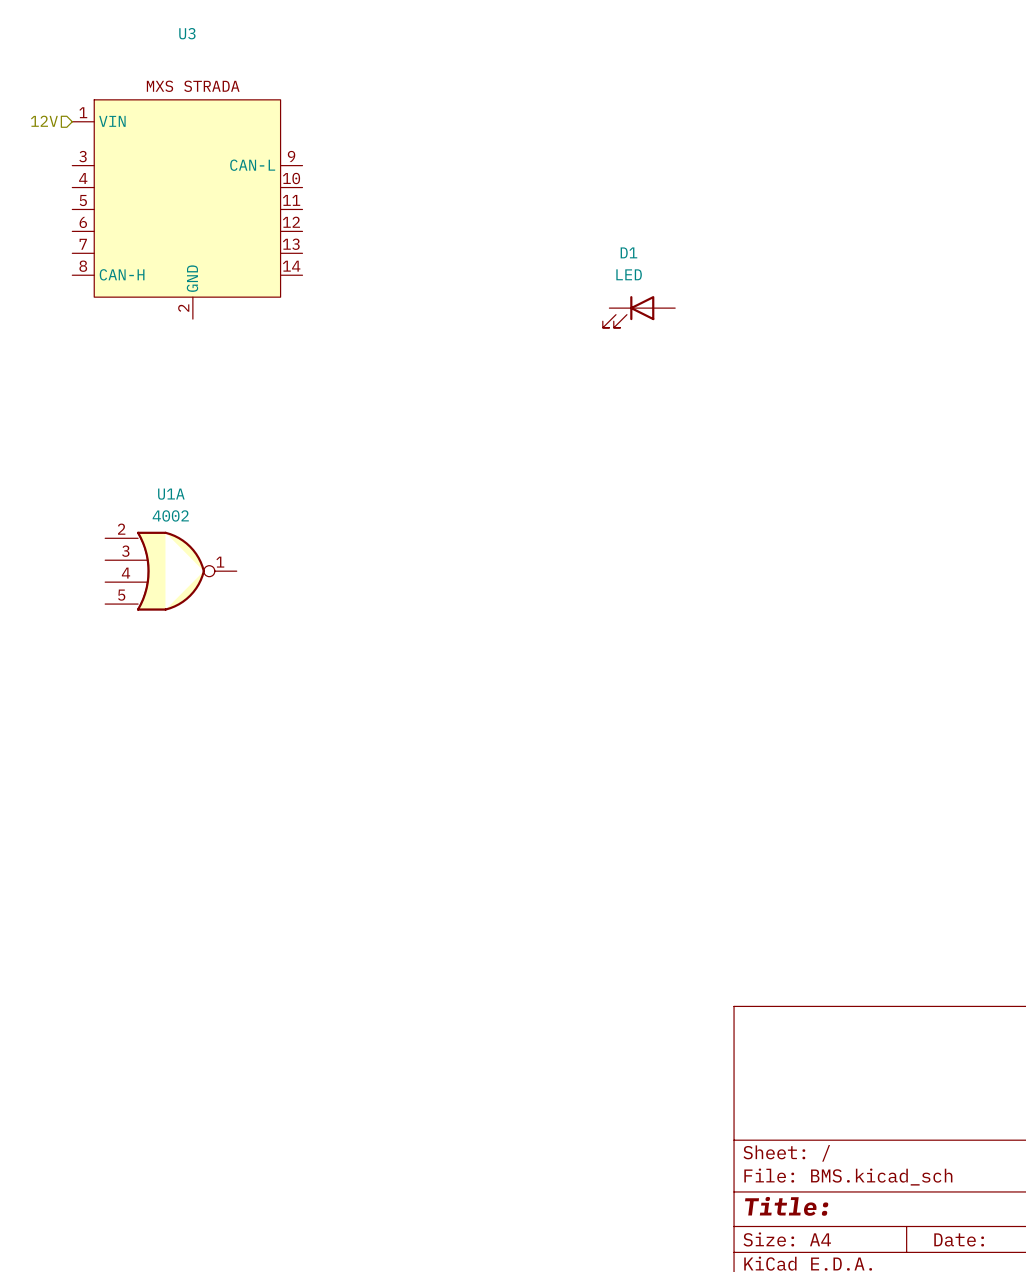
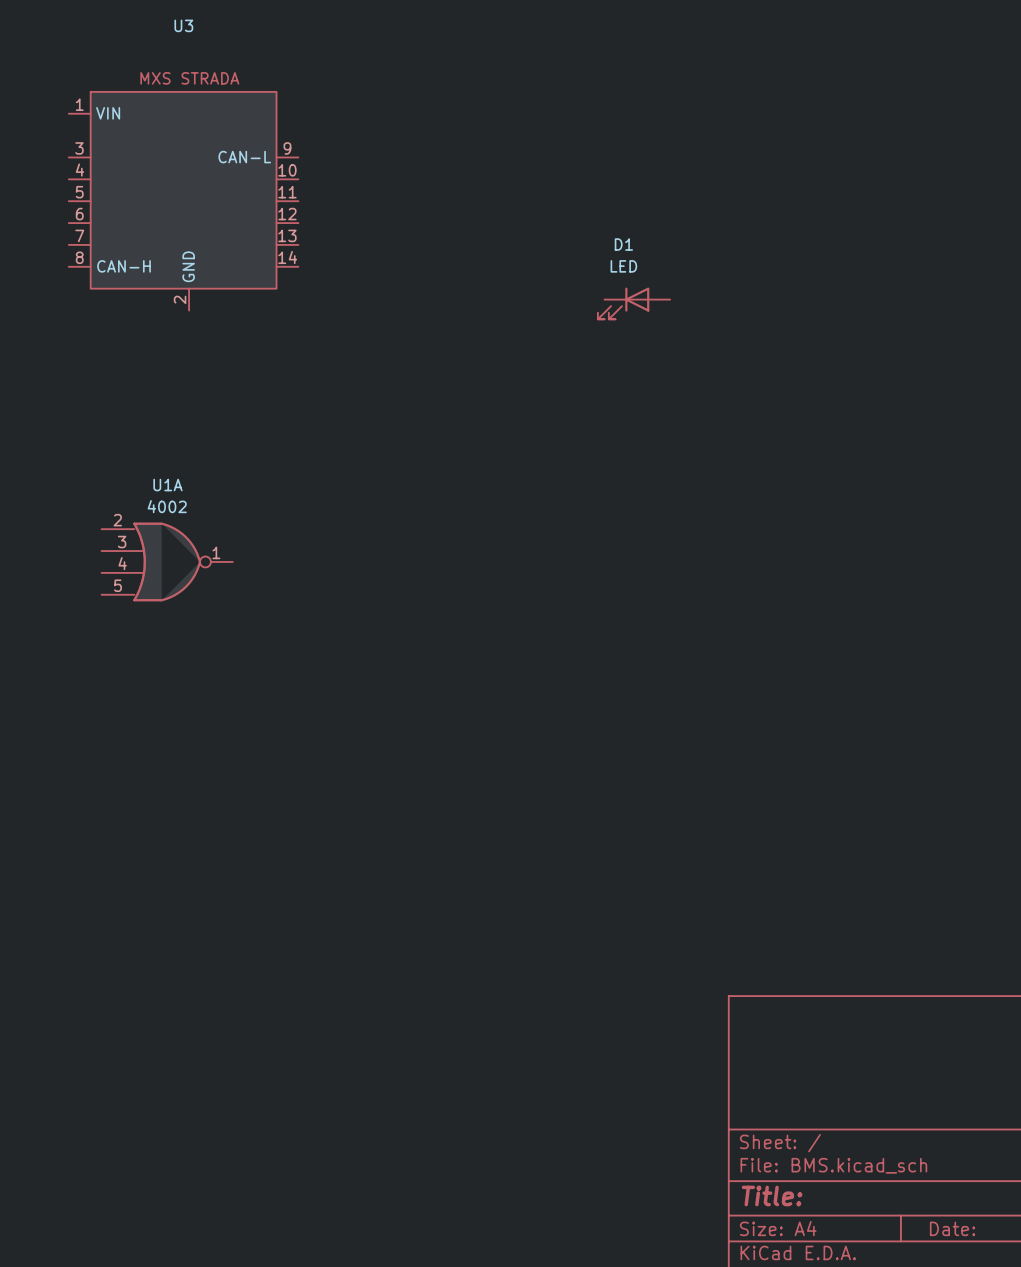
hierarchical label: 12V (44, 121) -> none

